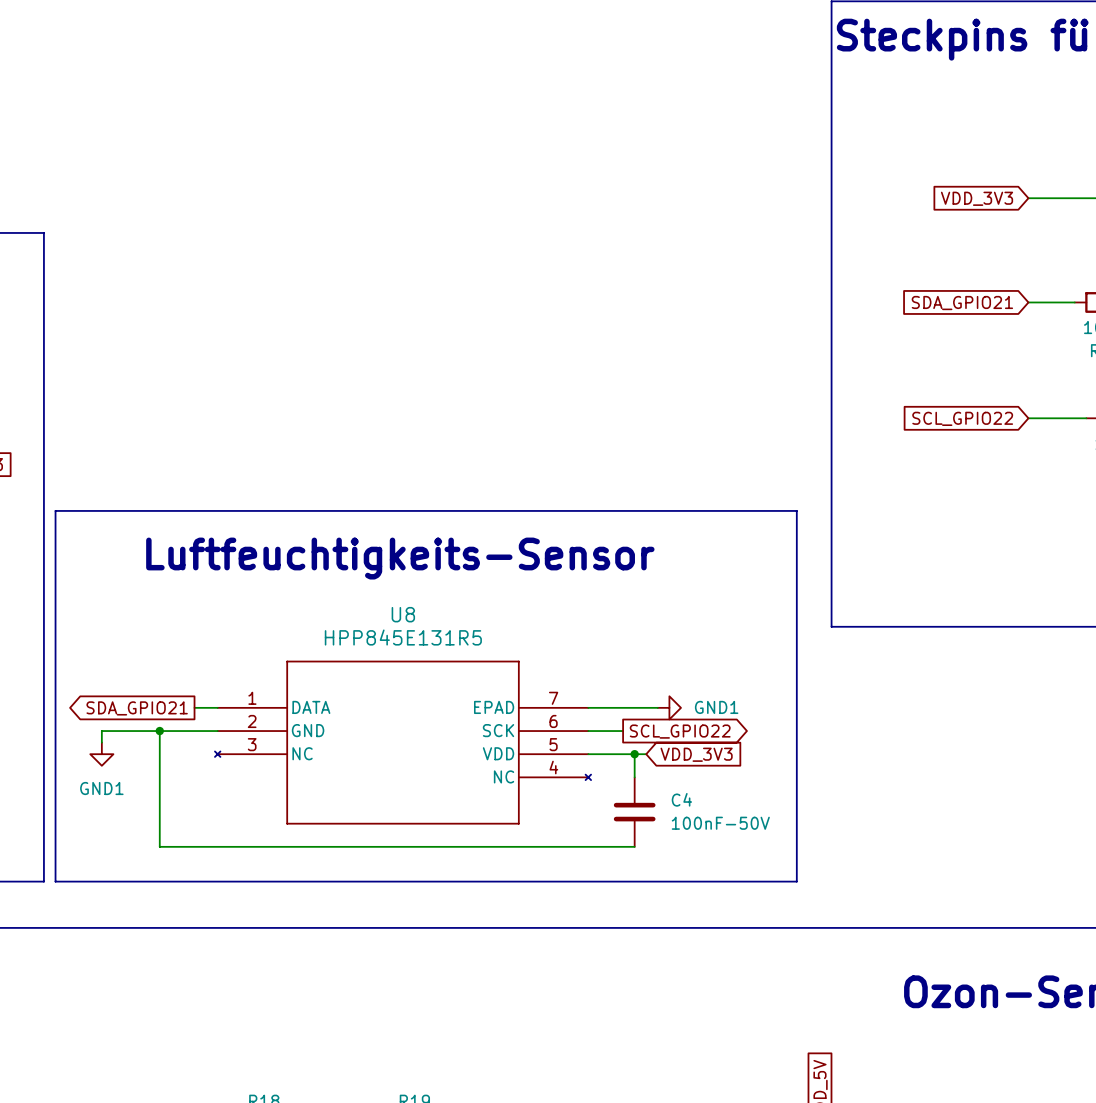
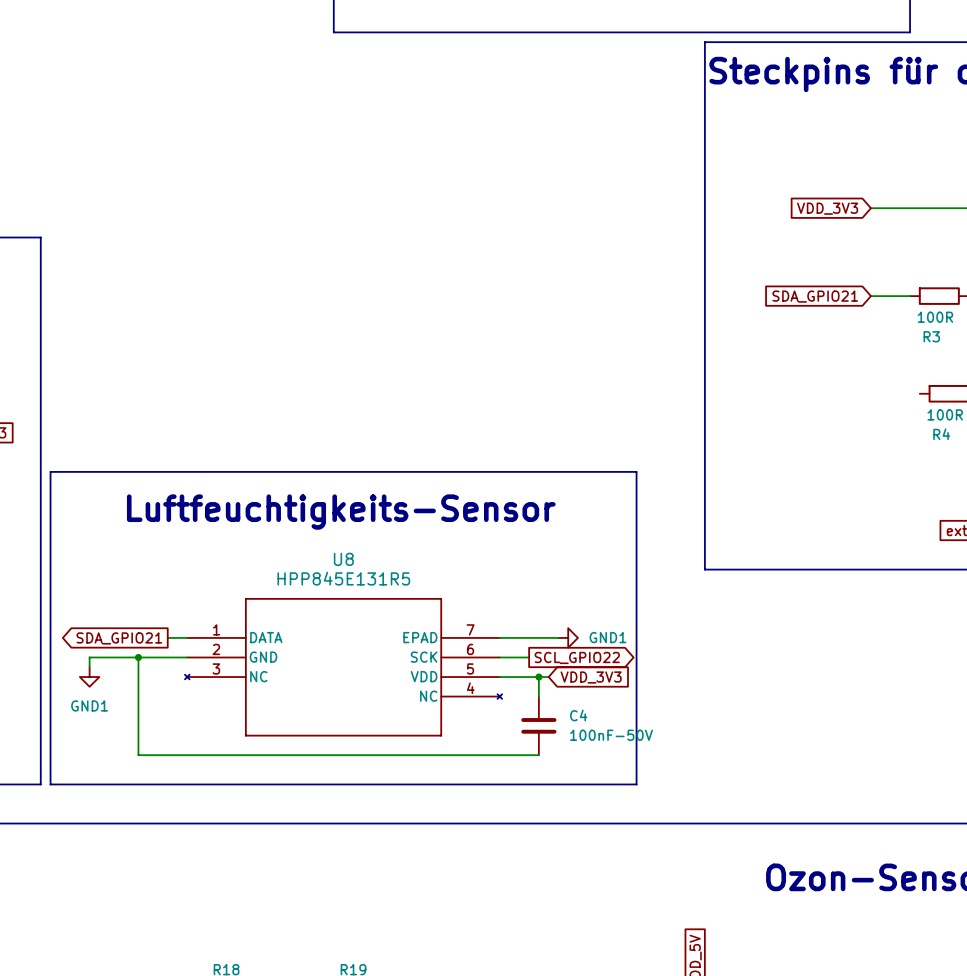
global label: SCL_GPIO22 (962, 418) -> none
wire: (1028, 418) (1086, 418) -> none
line: (750, 510) (796, 510) (796, 881) (750, 881) -> (636, 471) (636, 784)

